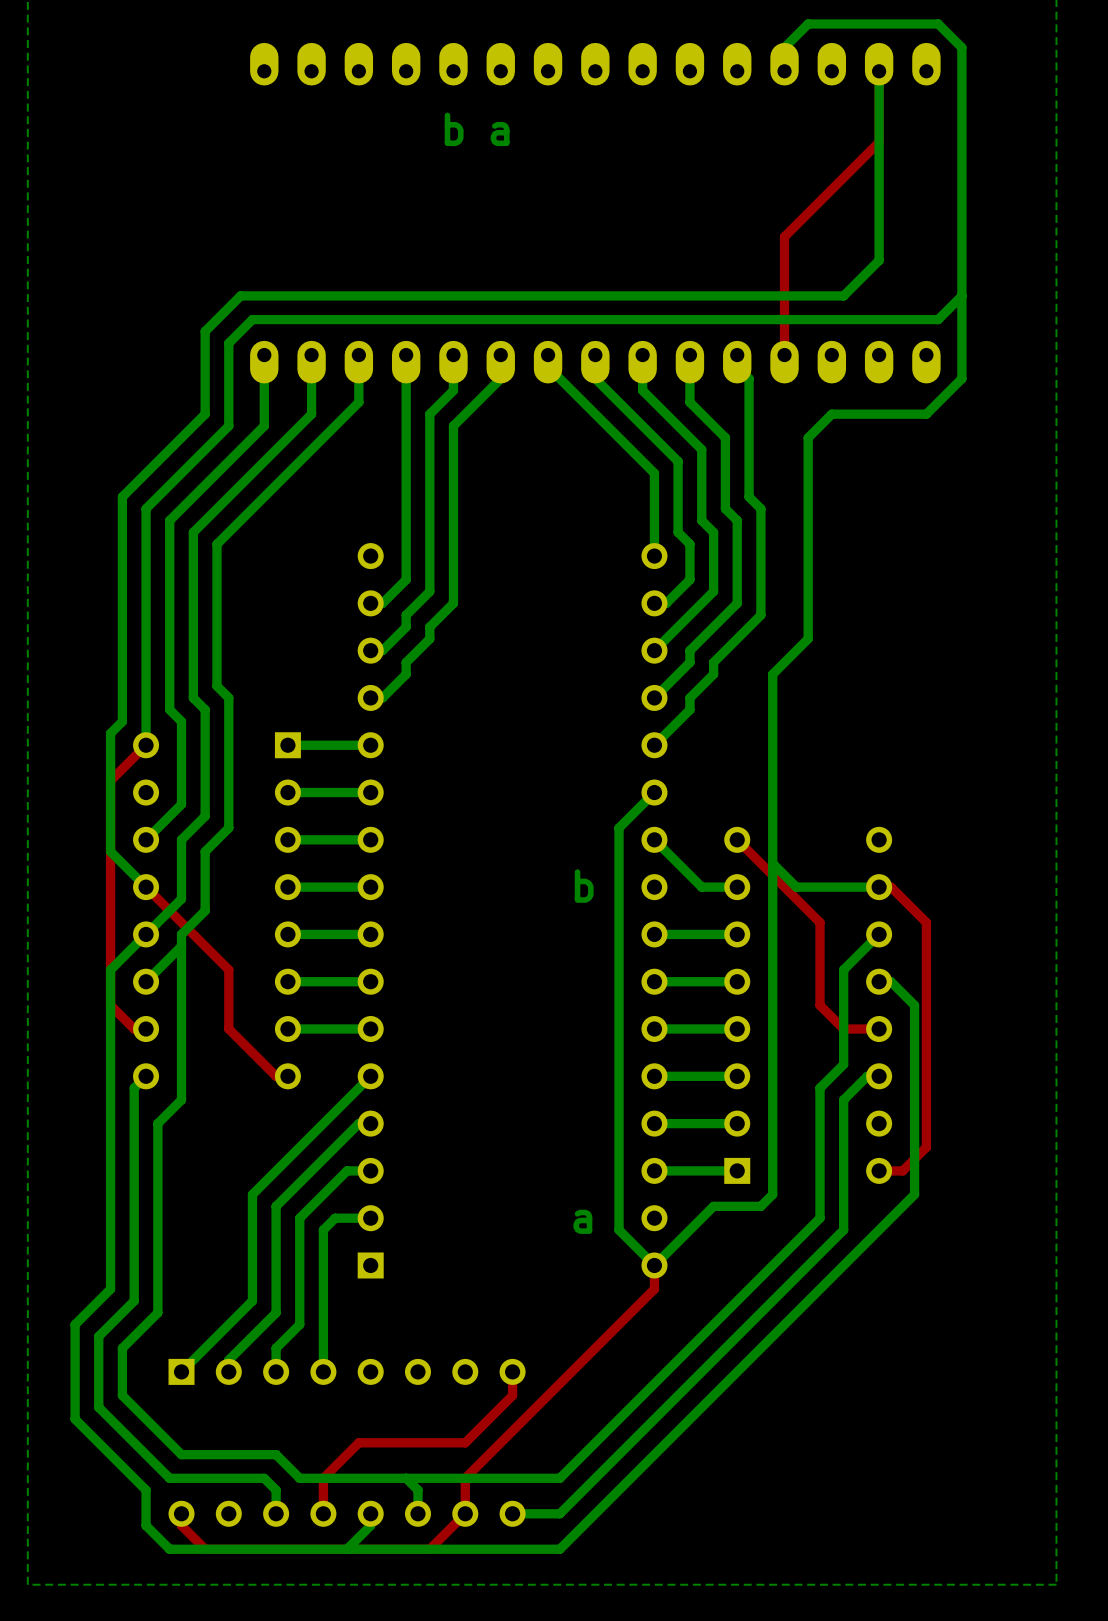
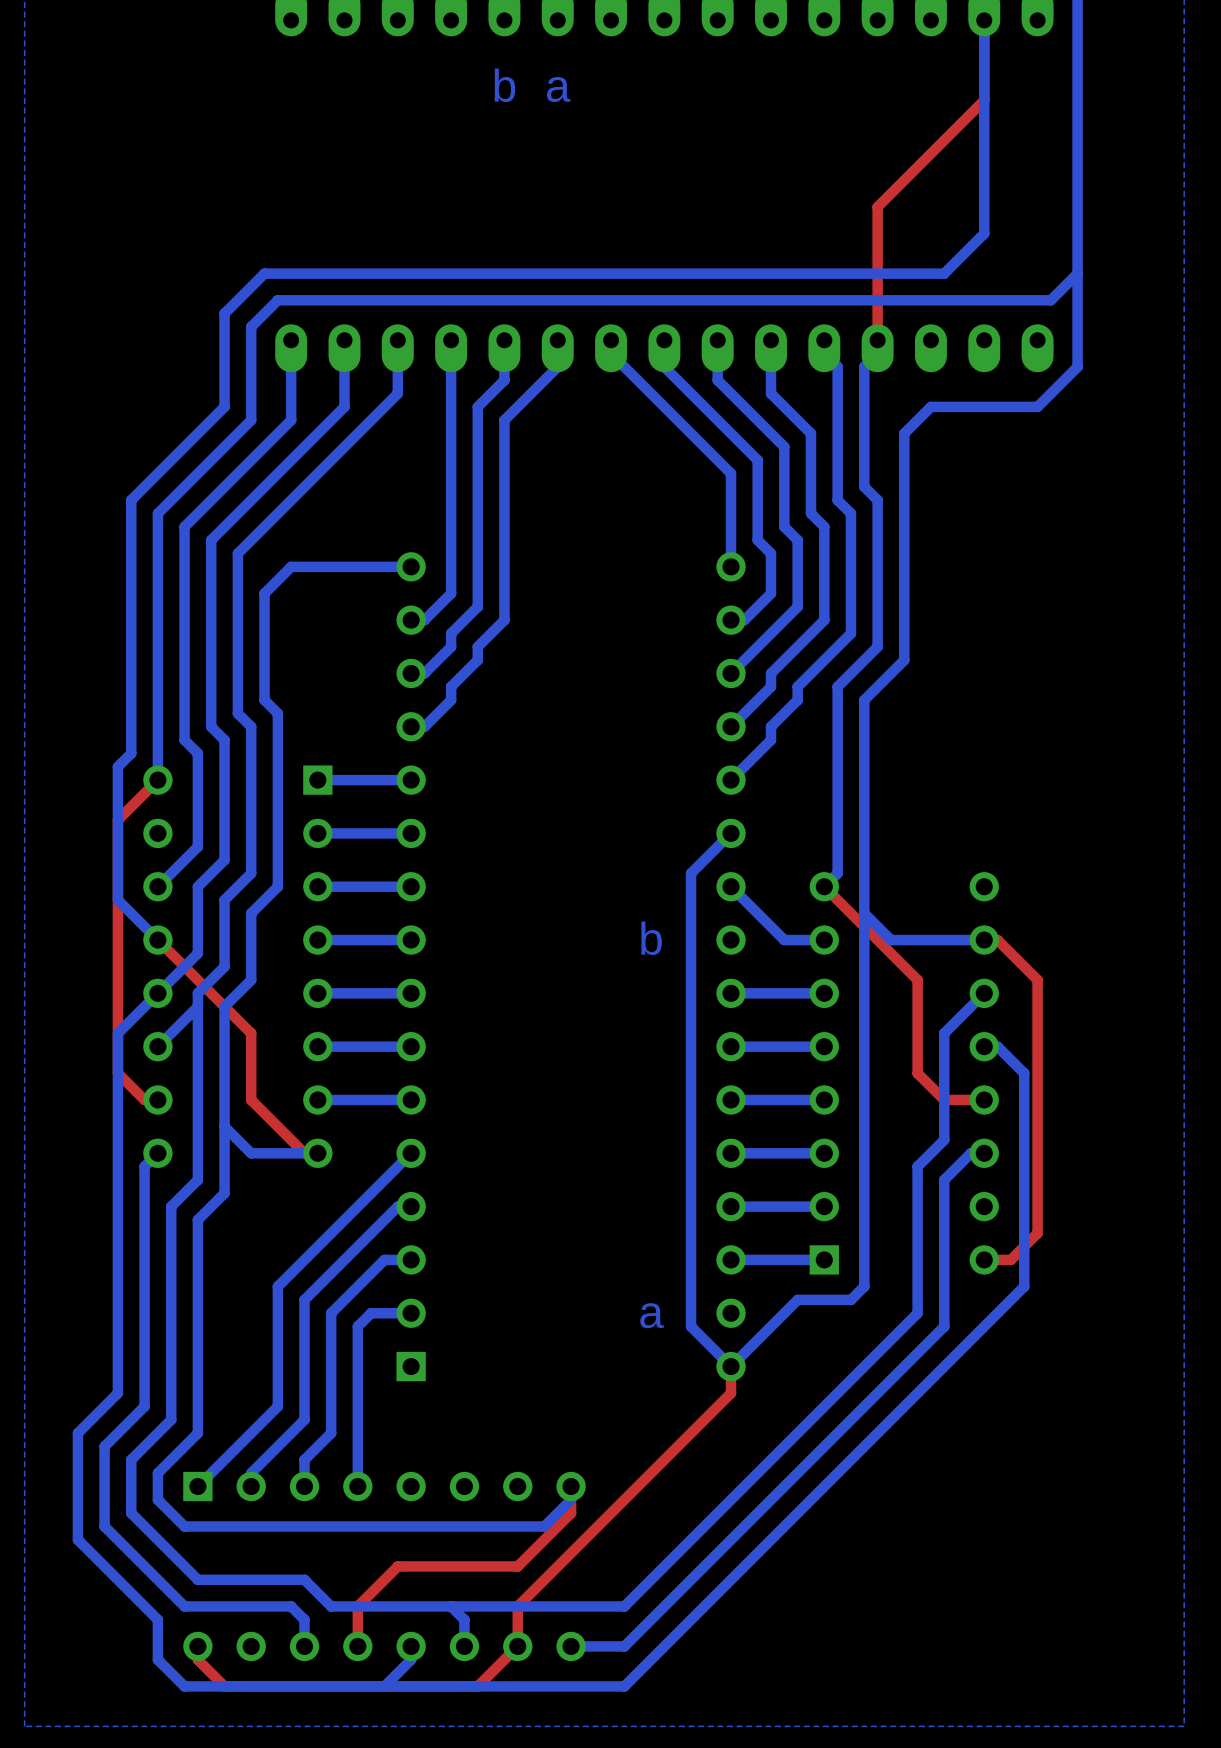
bottom track: none -> (877, 353) (864, 366) (864, 486) (877, 500) (877, 646) (837, 686) (837, 873) (824, 886)
bottom track: none -> (411, 566) (291, 566) (264, 593) (264, 700) (277, 713) (277, 886) (251, 913) (251, 980) (224, 1006) (224, 1193) (197, 1219) (197, 1433) (157, 1473) (157, 1499) (184, 1526) (544, 1526) (571, 1499) (571, 1486)
bottom track: none -> (224, 1126) (251, 1153) (317, 1153)

